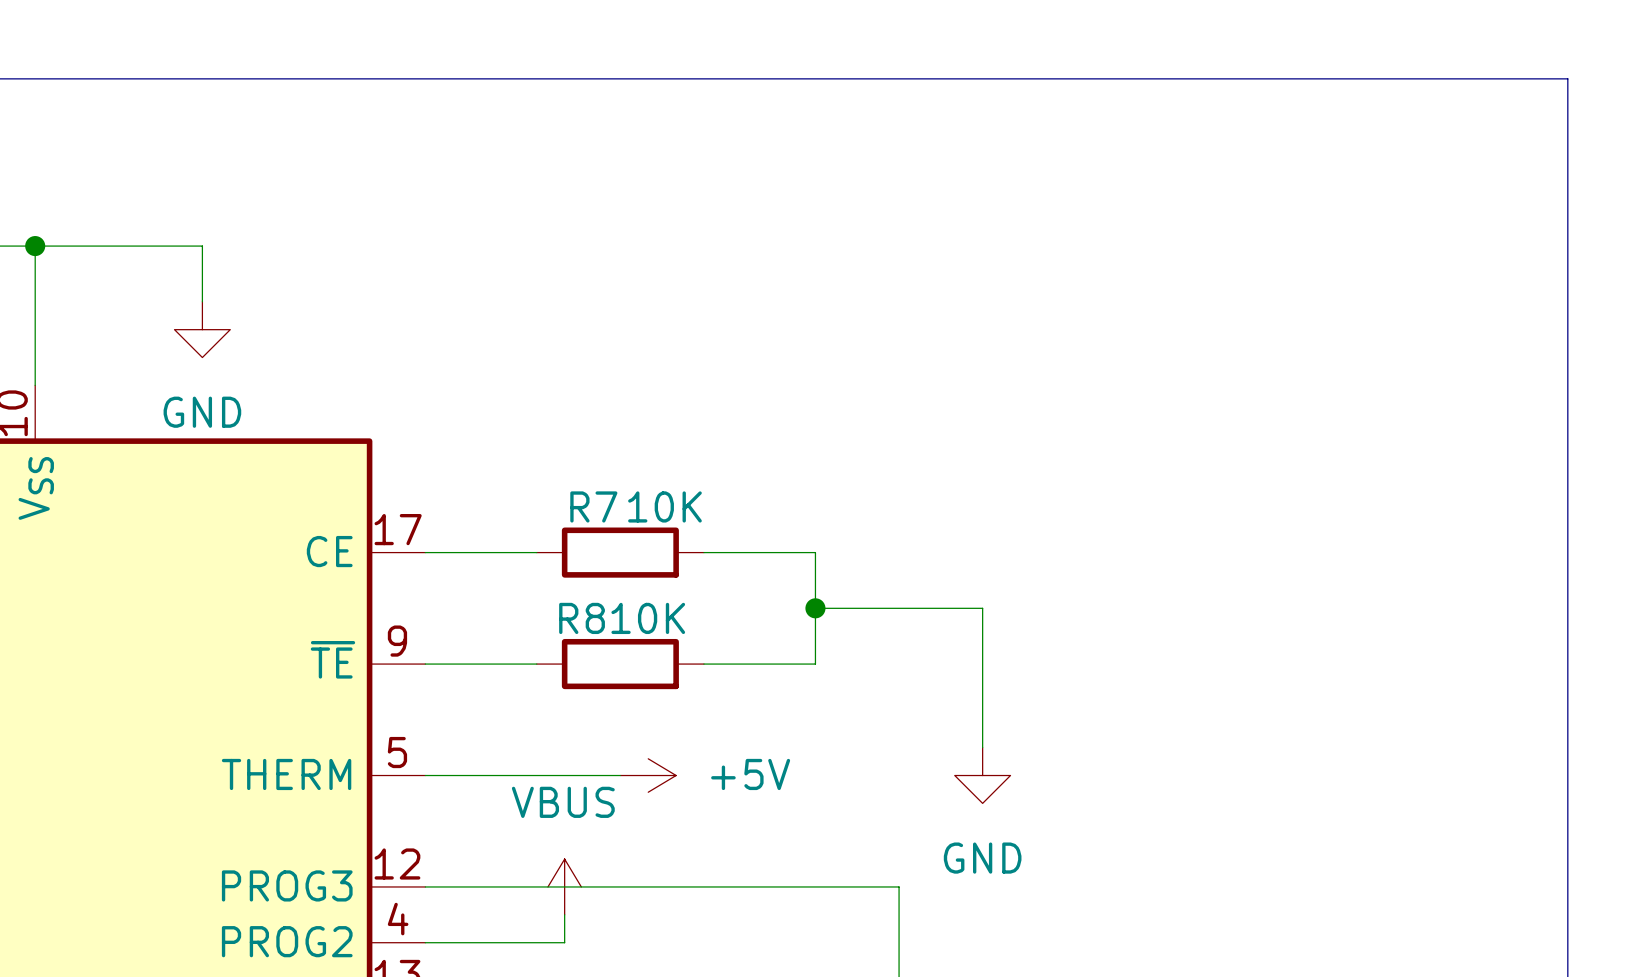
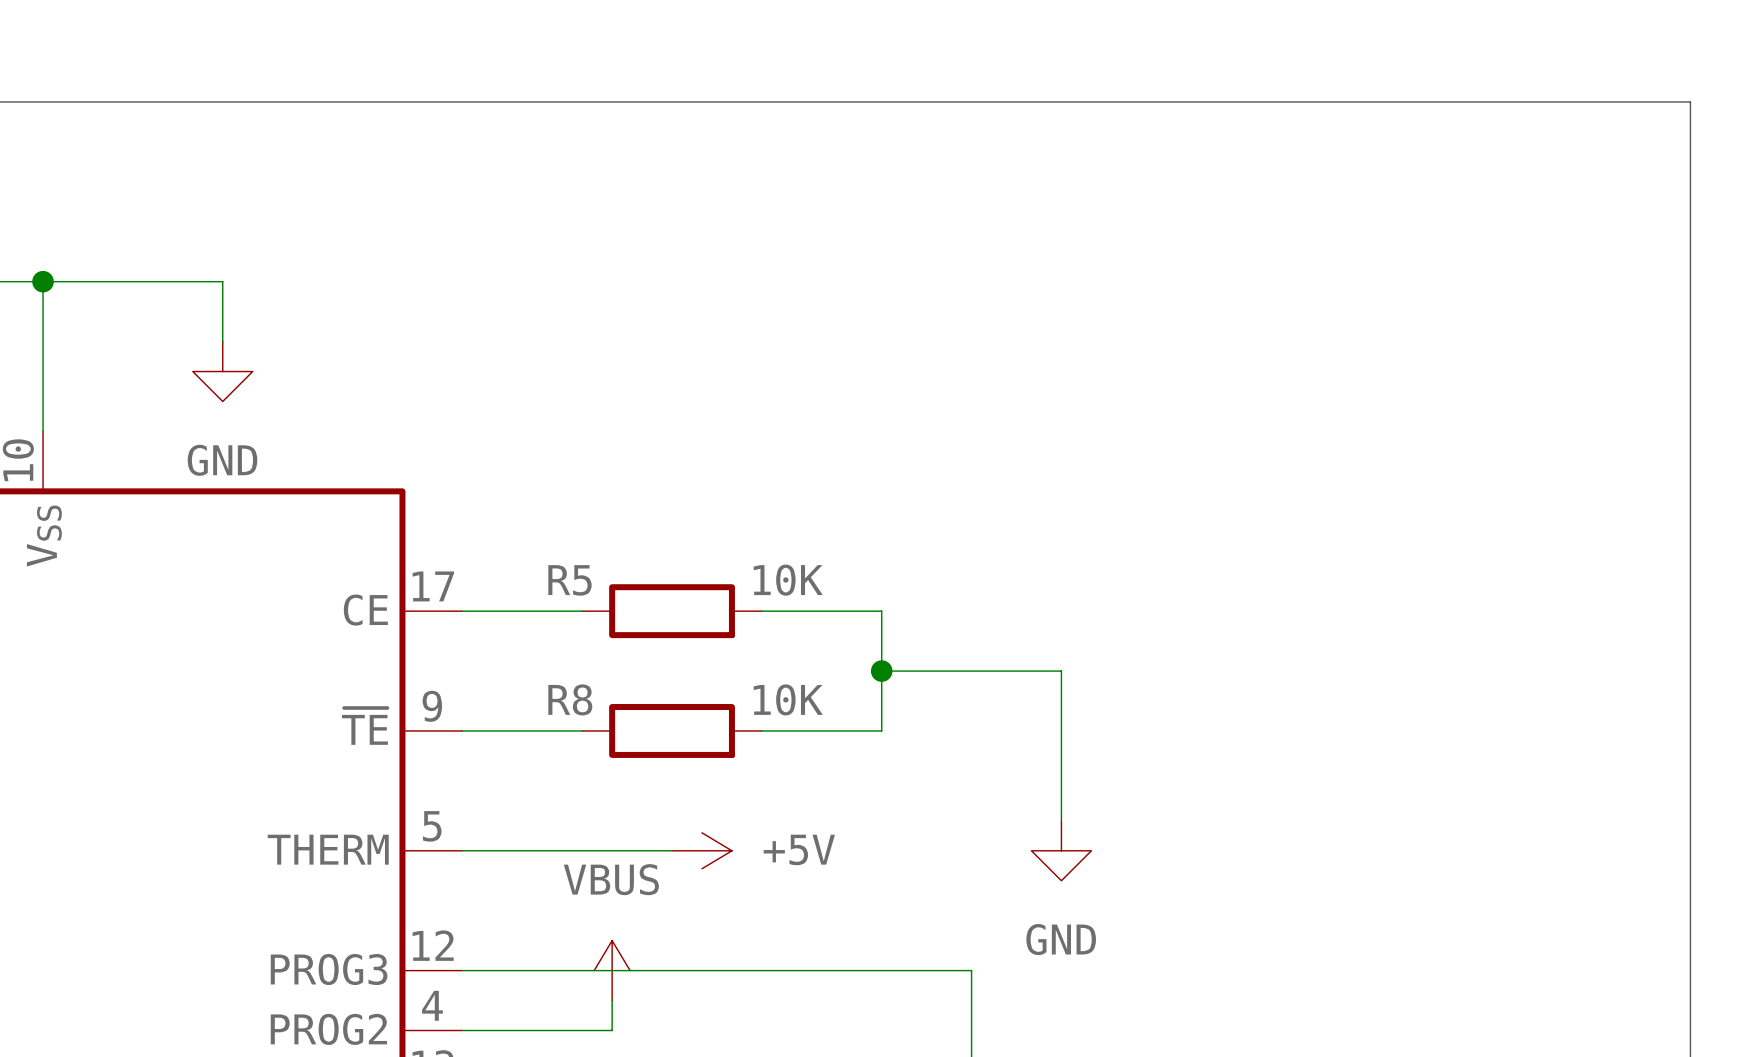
R7 name: R7 (593, 506) -> R5 (569, 580)
R7 value position: 10K (664, 506) -> 10K (788, 580)
R8 name position: R8 (582, 618) -> R8 (570, 699)
R8 value position: 10K (648, 618) -> 10K (788, 699)

